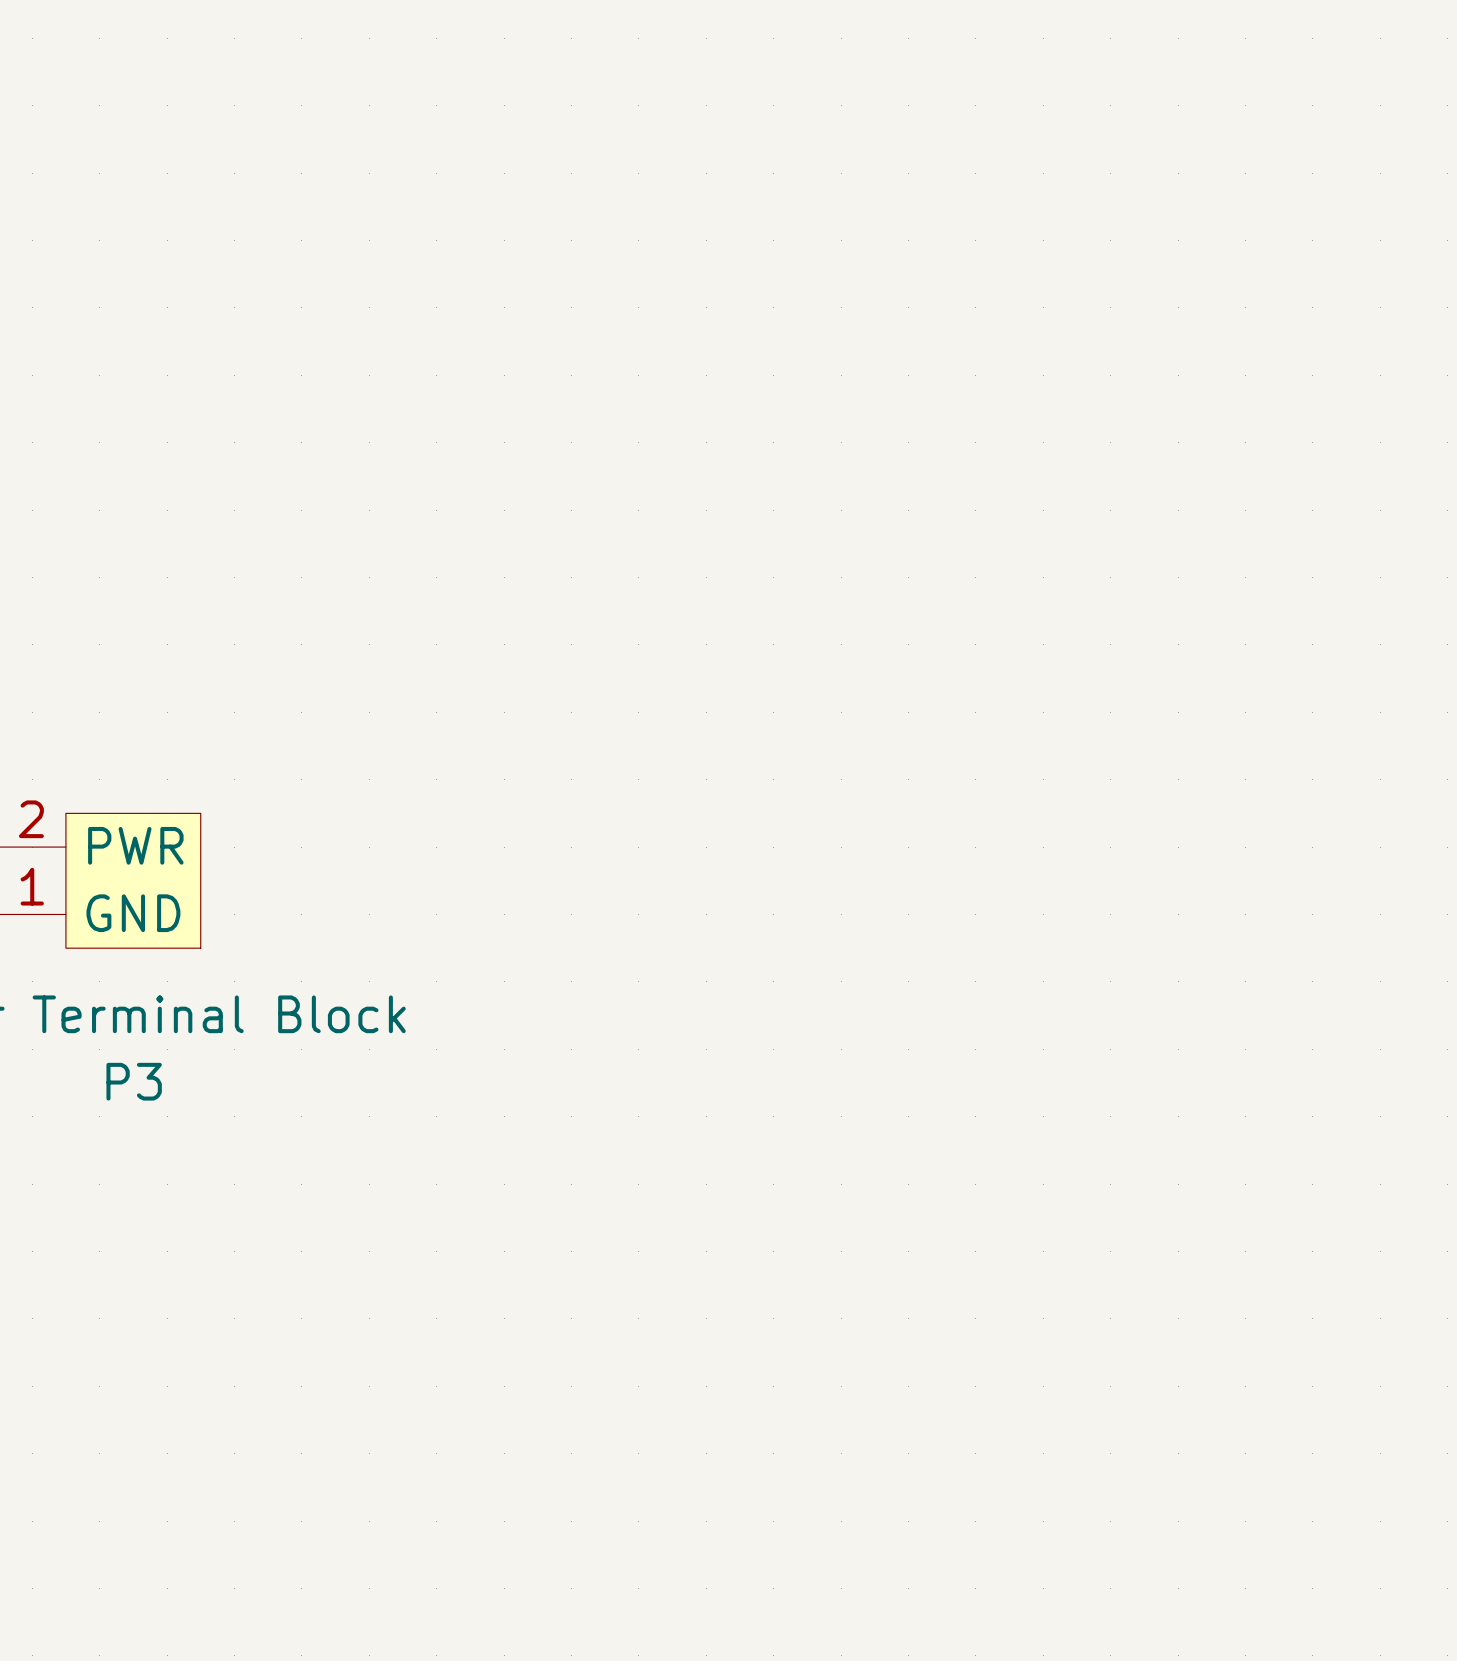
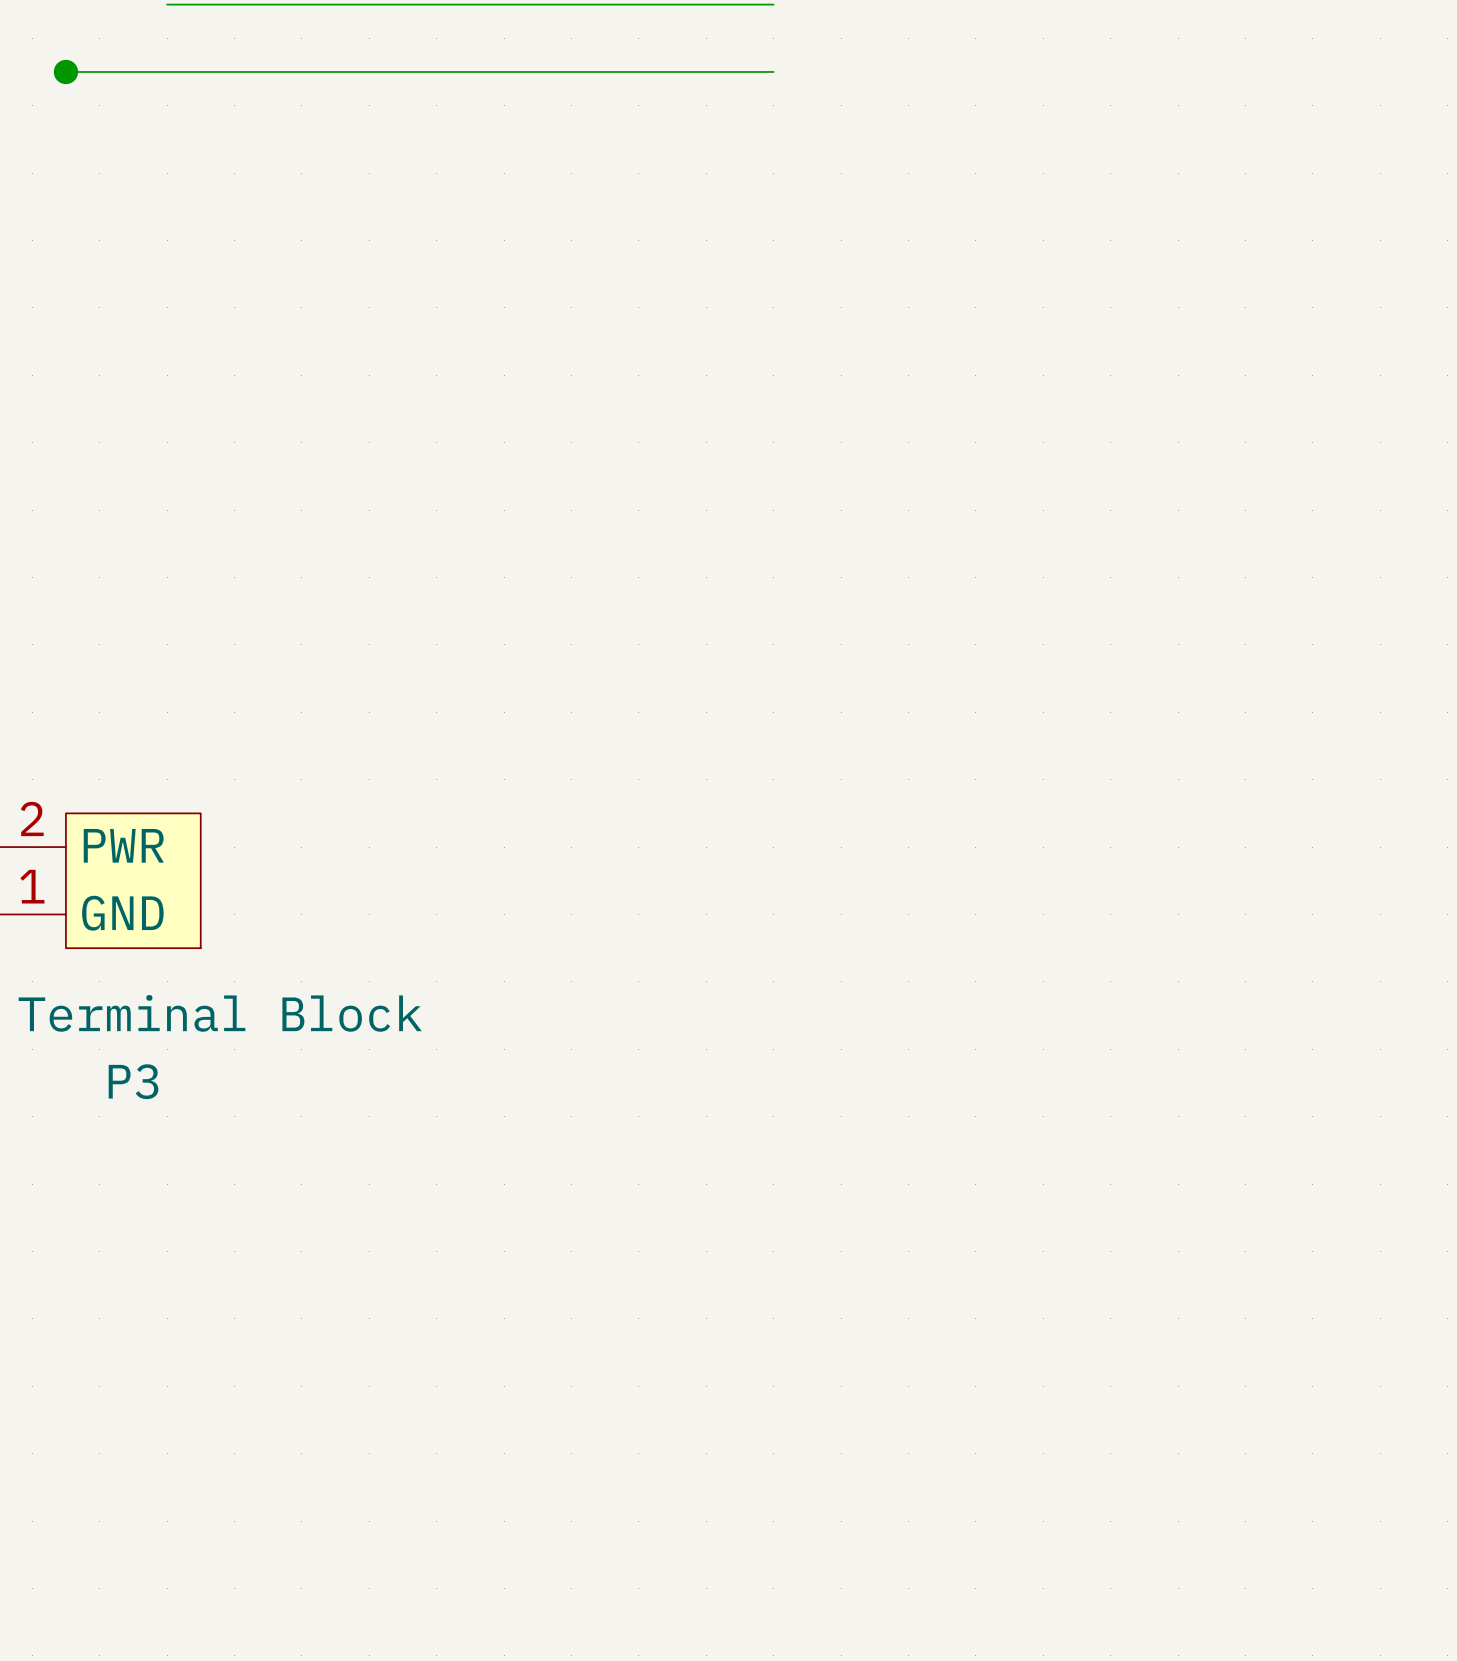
wire: none -> (167, 4) (773, 4)
wire: none -> (65, 71) (773, 71)
junction: none -> (65, 71)

